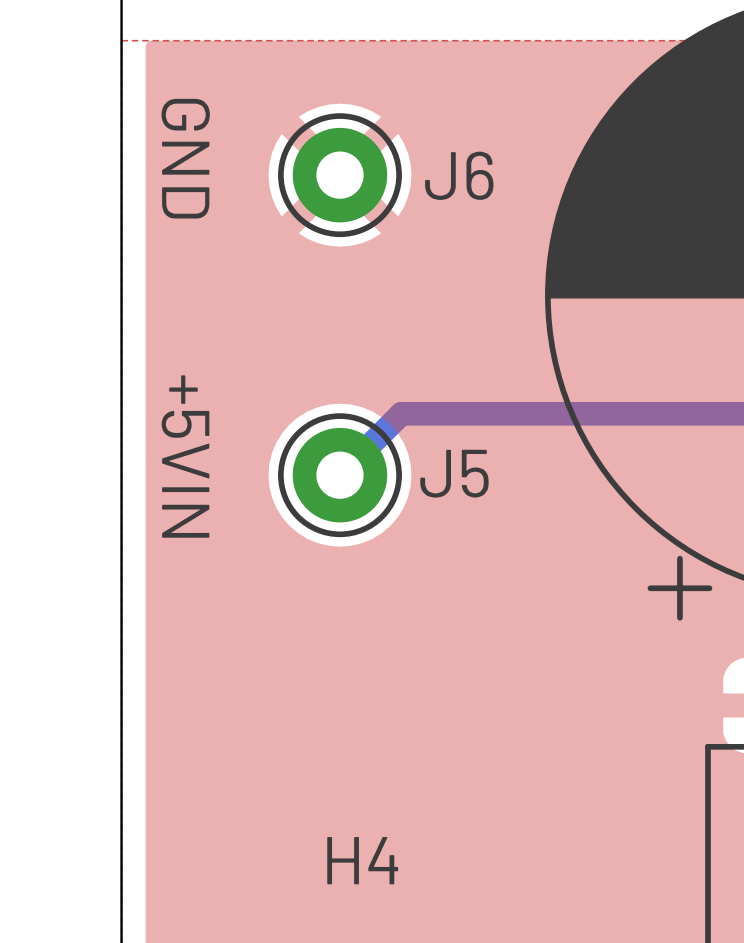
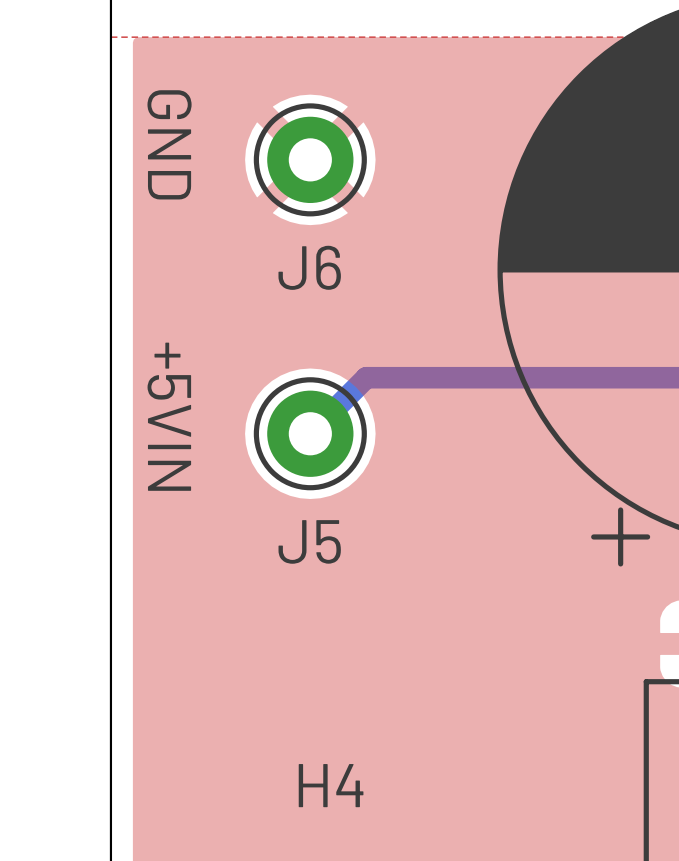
J6 name position: J6 (459, 175) -> J6 (309, 267)
J5 name position: J5 (454, 473) -> J5 (309, 541)

